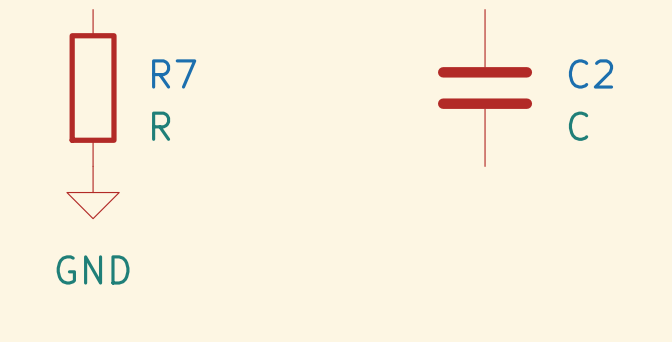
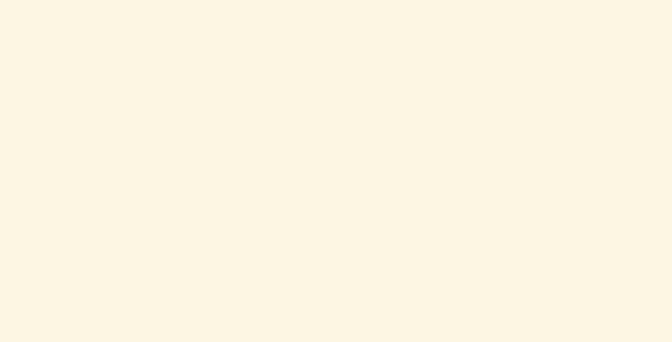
R7: R (93, 88) -> none
C2: C (485, 88) -> none
power symbol: GND (93, 192) -> none

